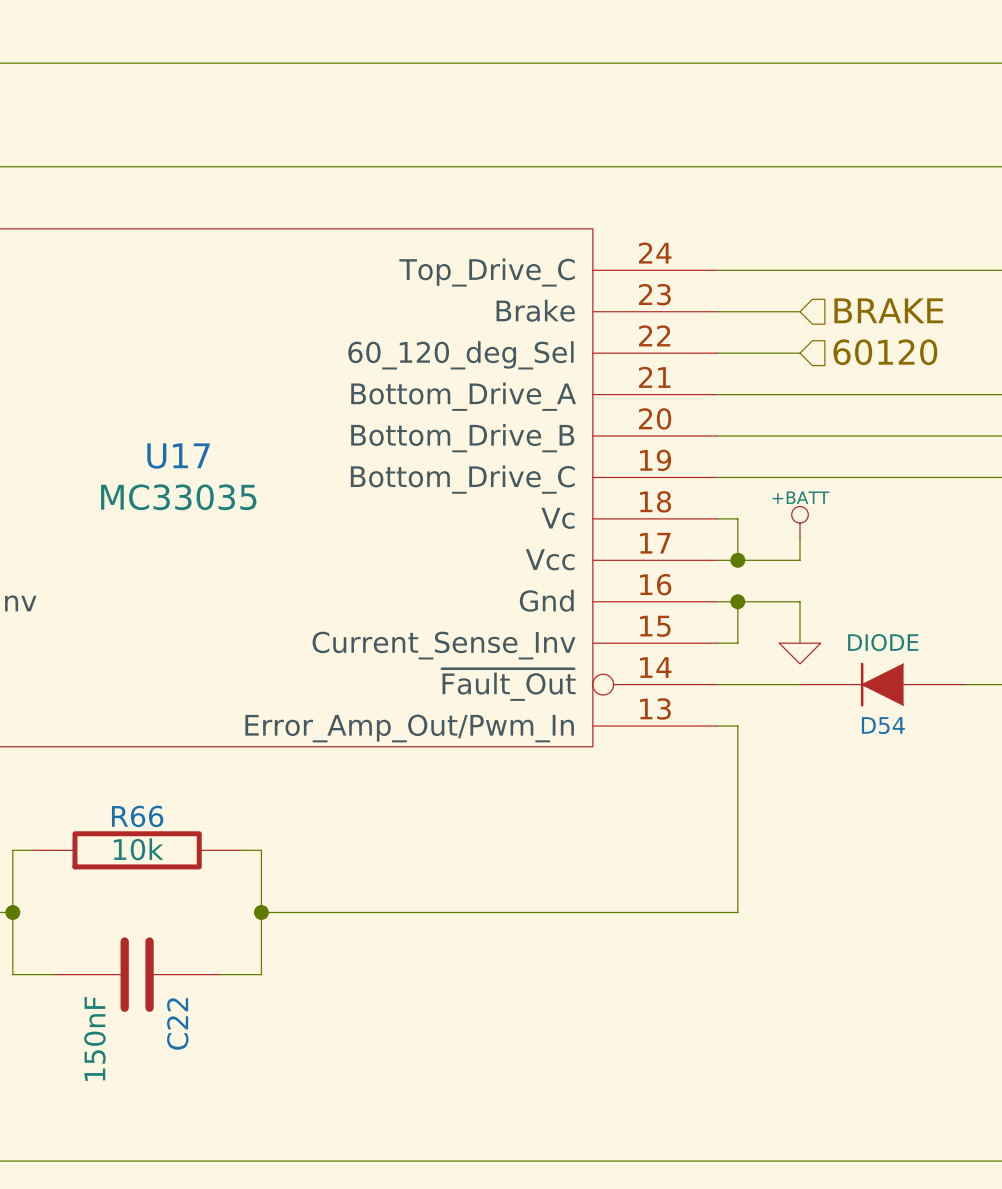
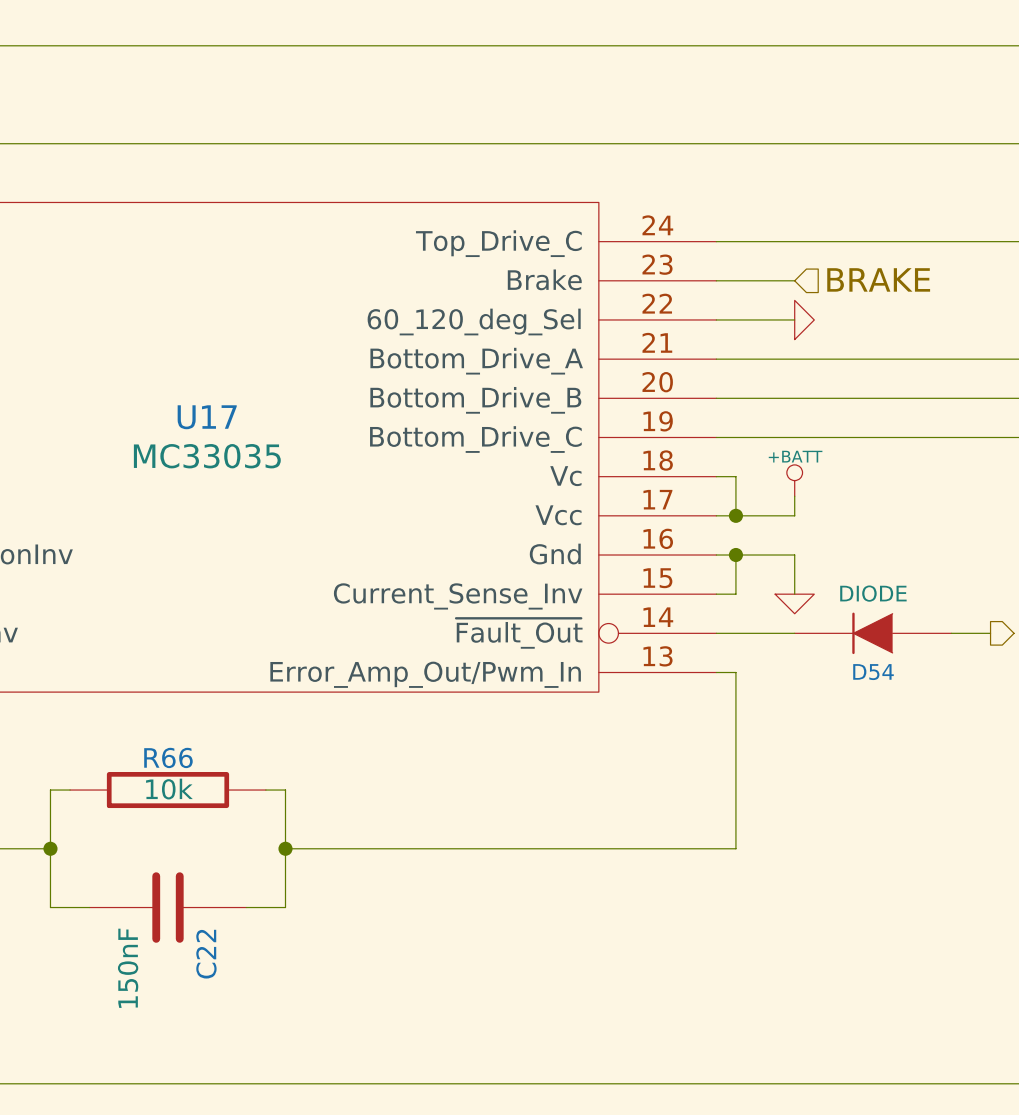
hierarchical label: 60120 (885, 352) -> none
power symbol: none -> (804, 319)

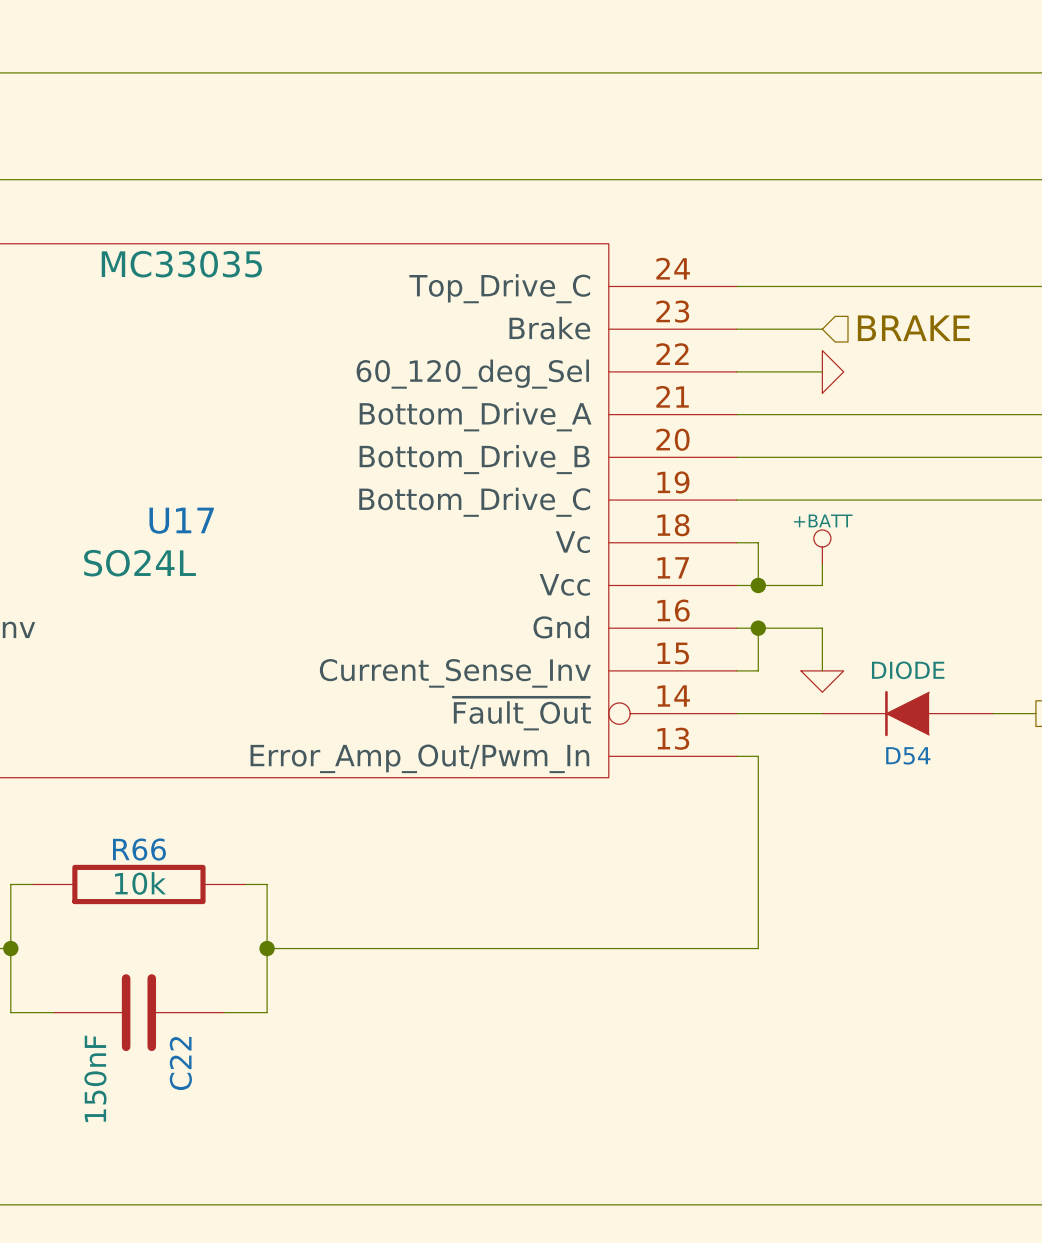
U17 name position: U17 (207, 417) -> U17 (181, 520)
U17 value position: MC33035 (207, 456) -> MC33035 (181, 264)
U17 text: none -> SO24L (140, 563)

